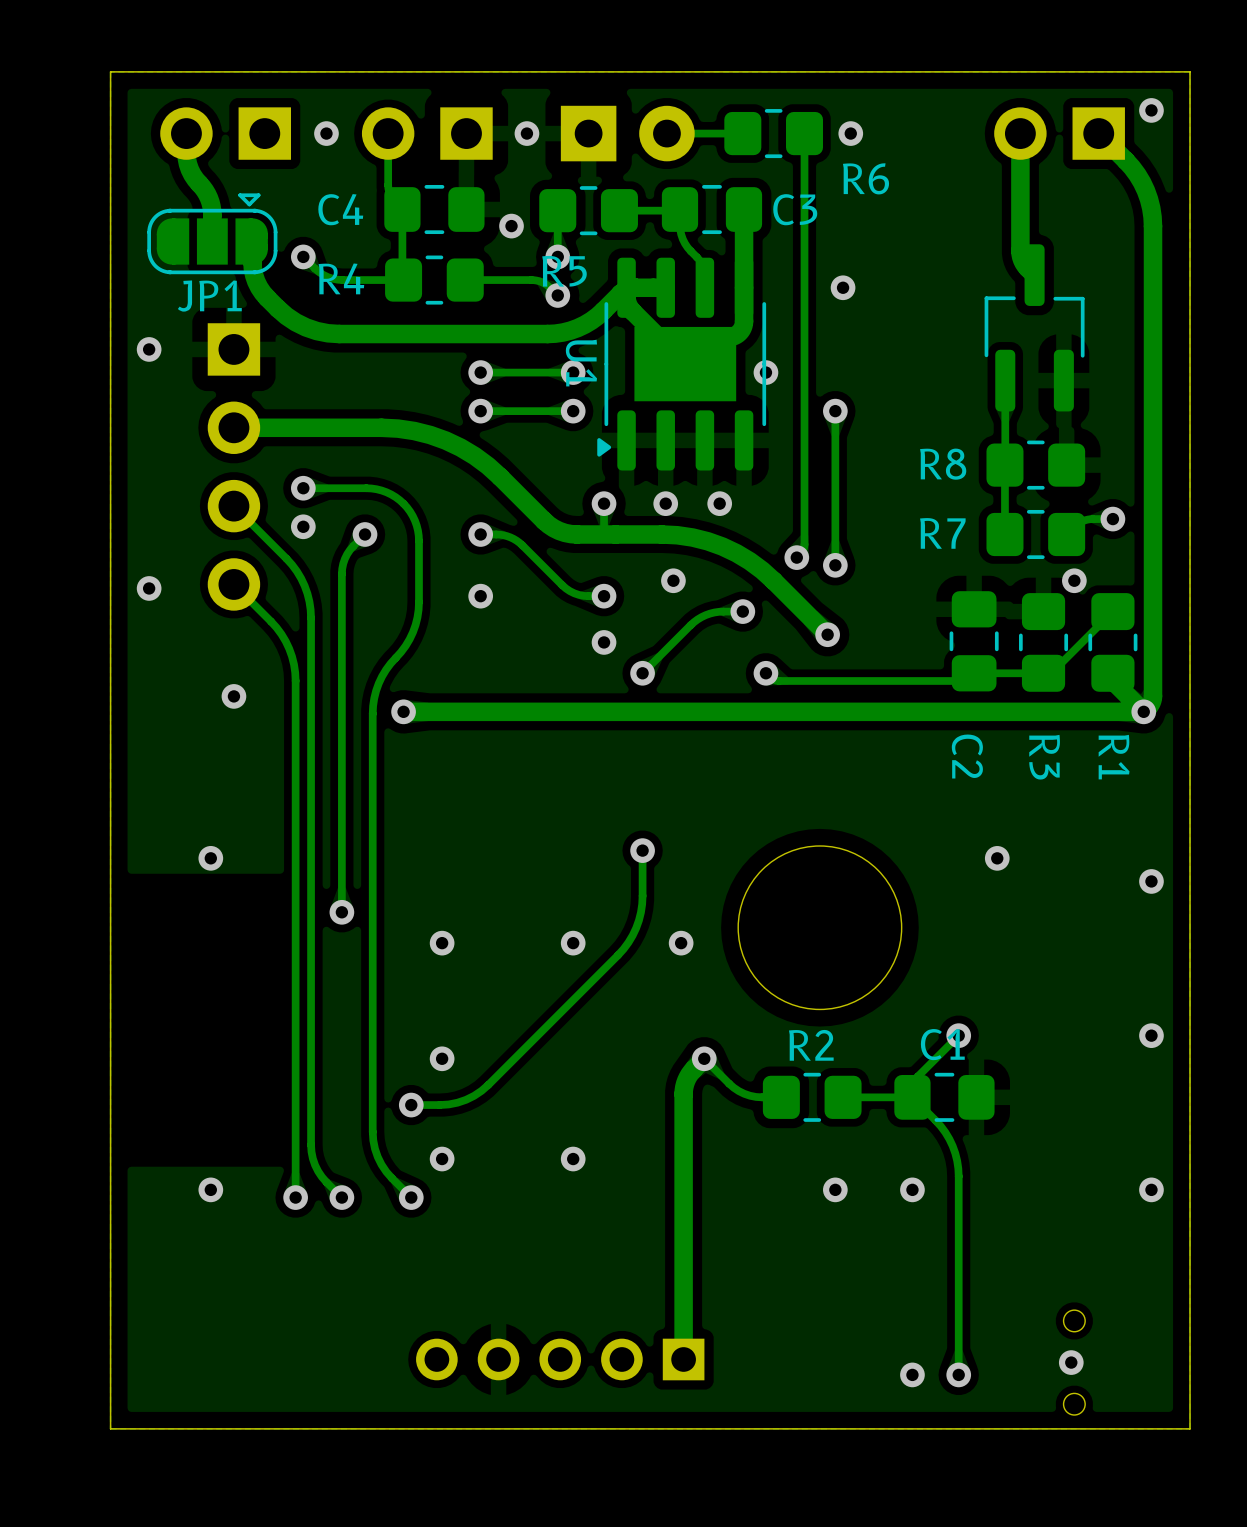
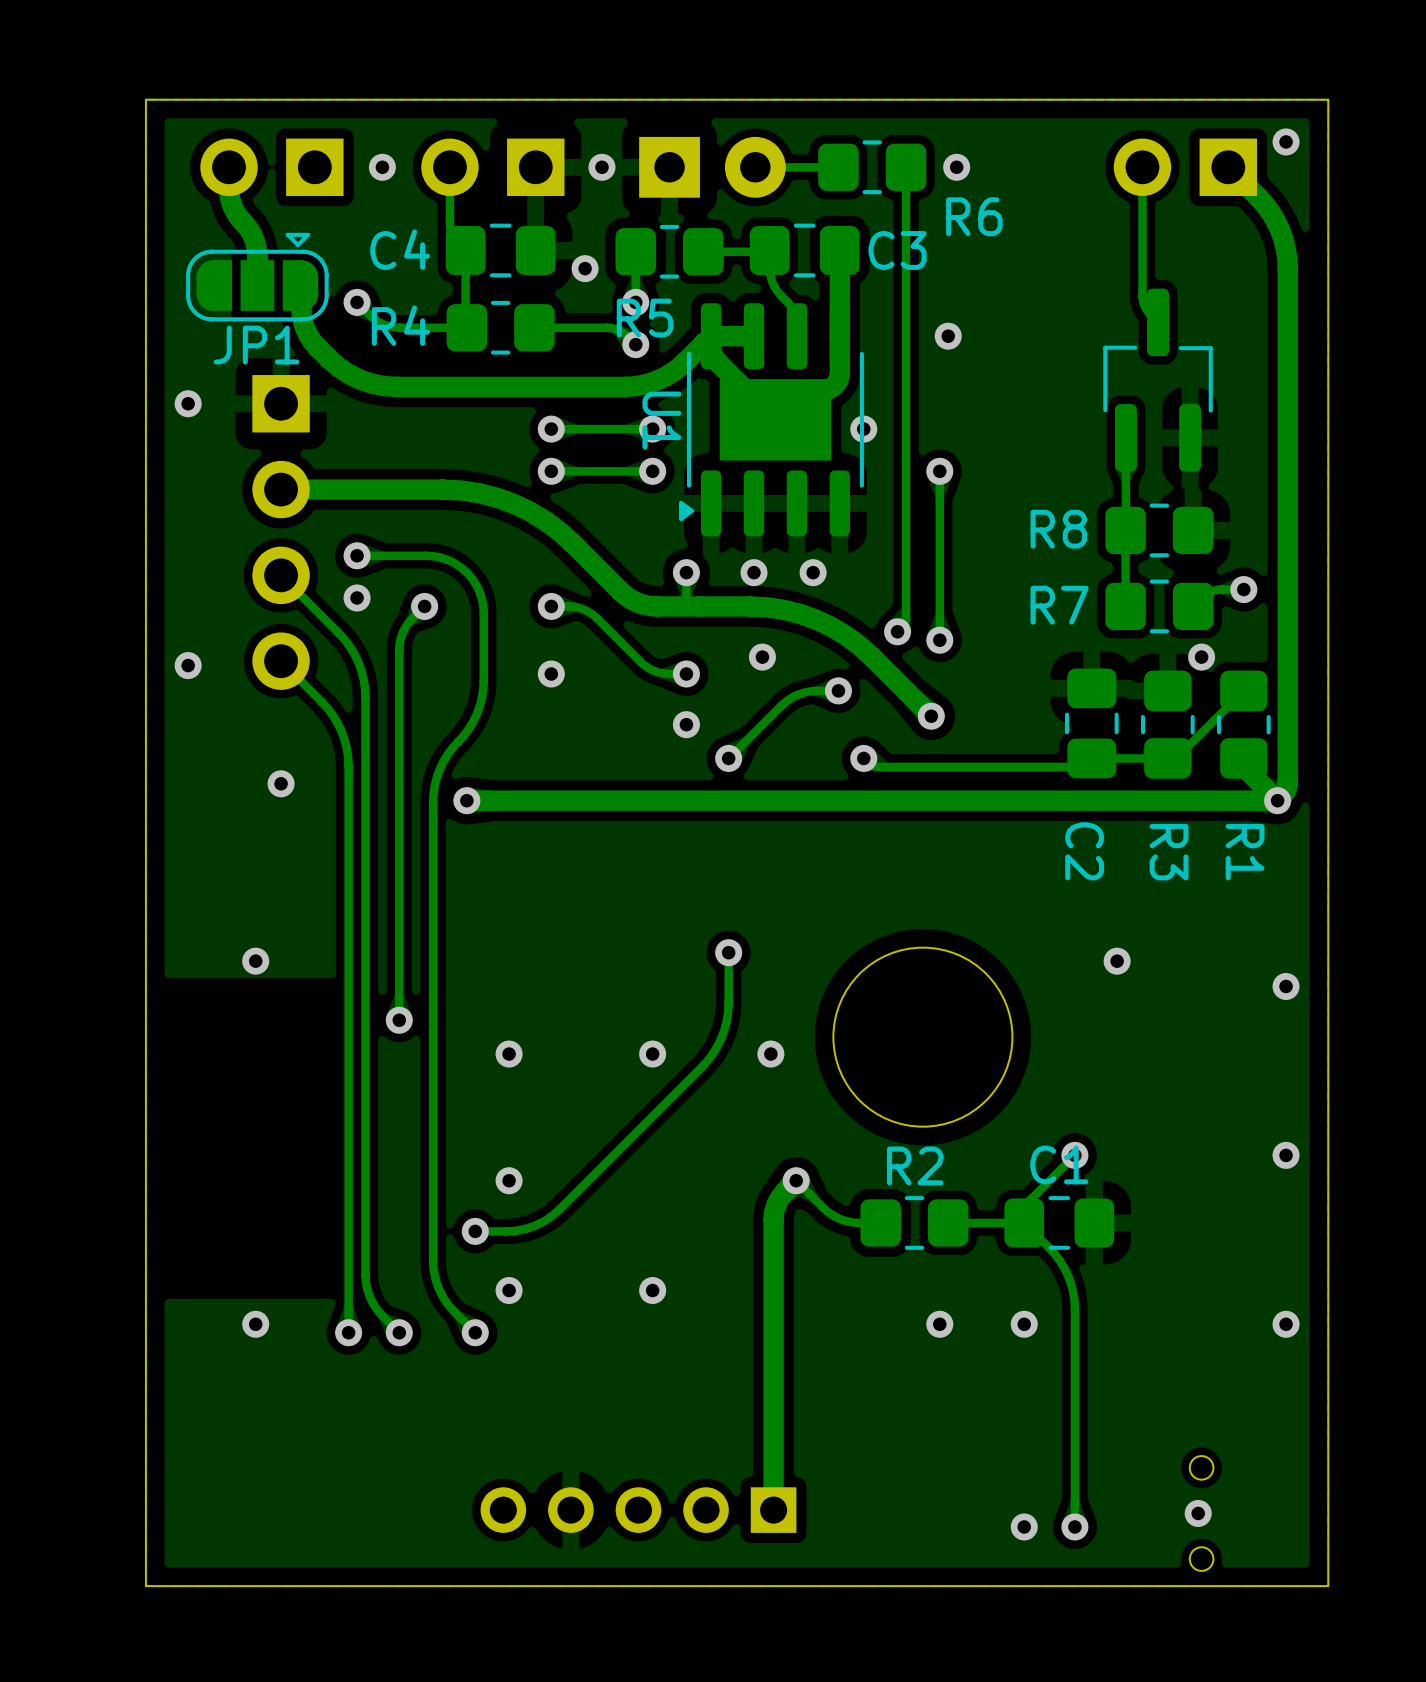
track width: thick (1020, 141) (1020, 254) (1023, 263) (1034, 275) -> thin (1142, 175) (1142, 299) (1146, 309) (1158, 322)

